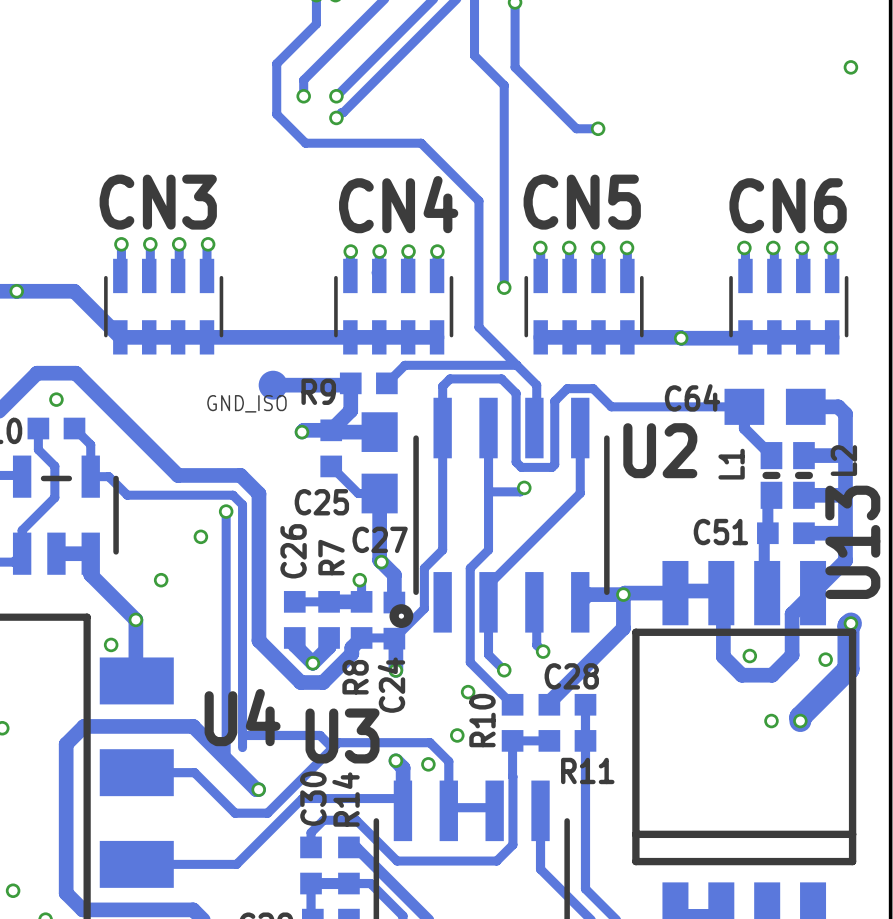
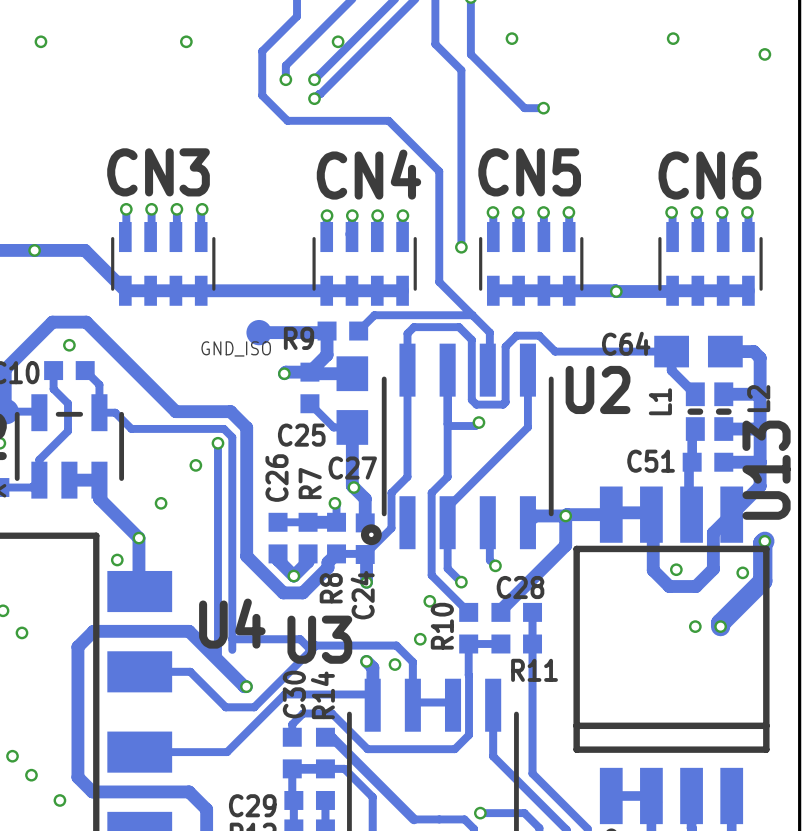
via: none -> (511, 38)
via: none -> (673, 38)
via: none -> (40, 41)
via: none -> (186, 41)
via: none -> (338, 41)

